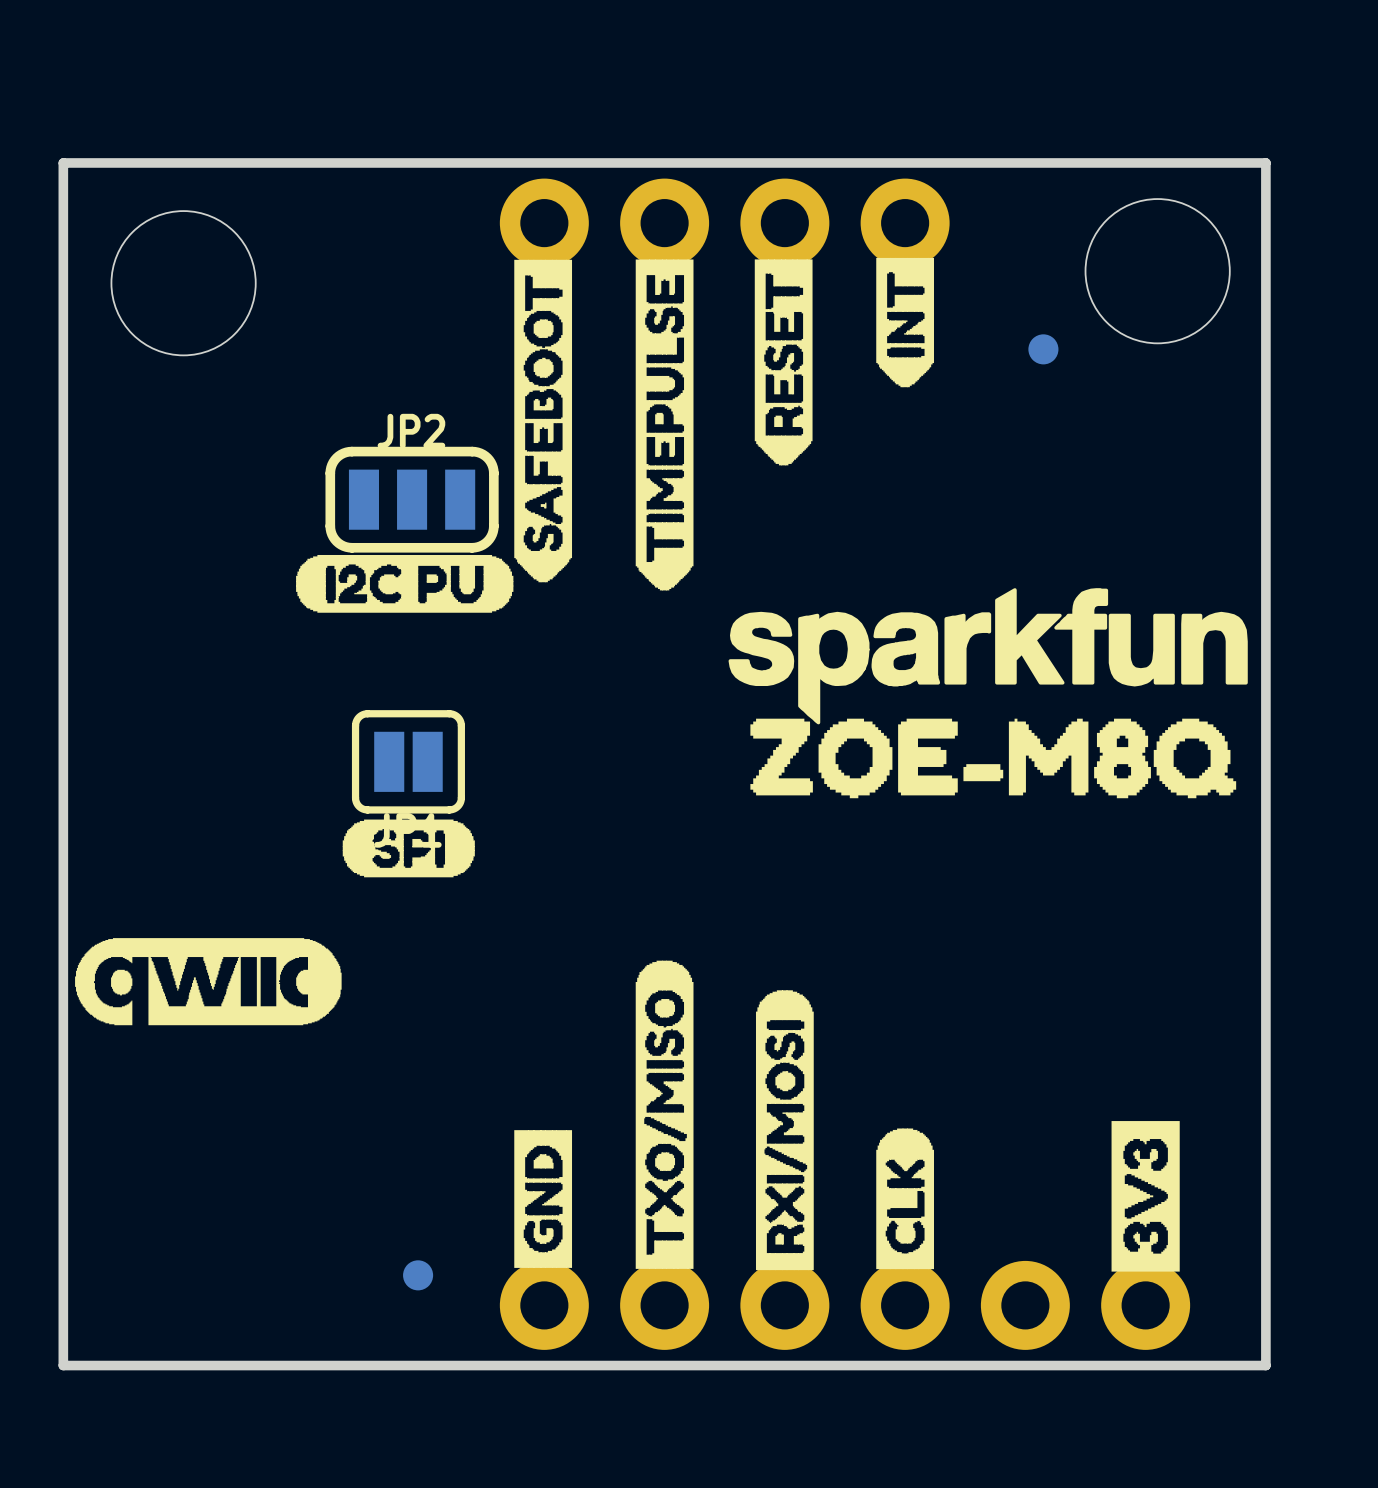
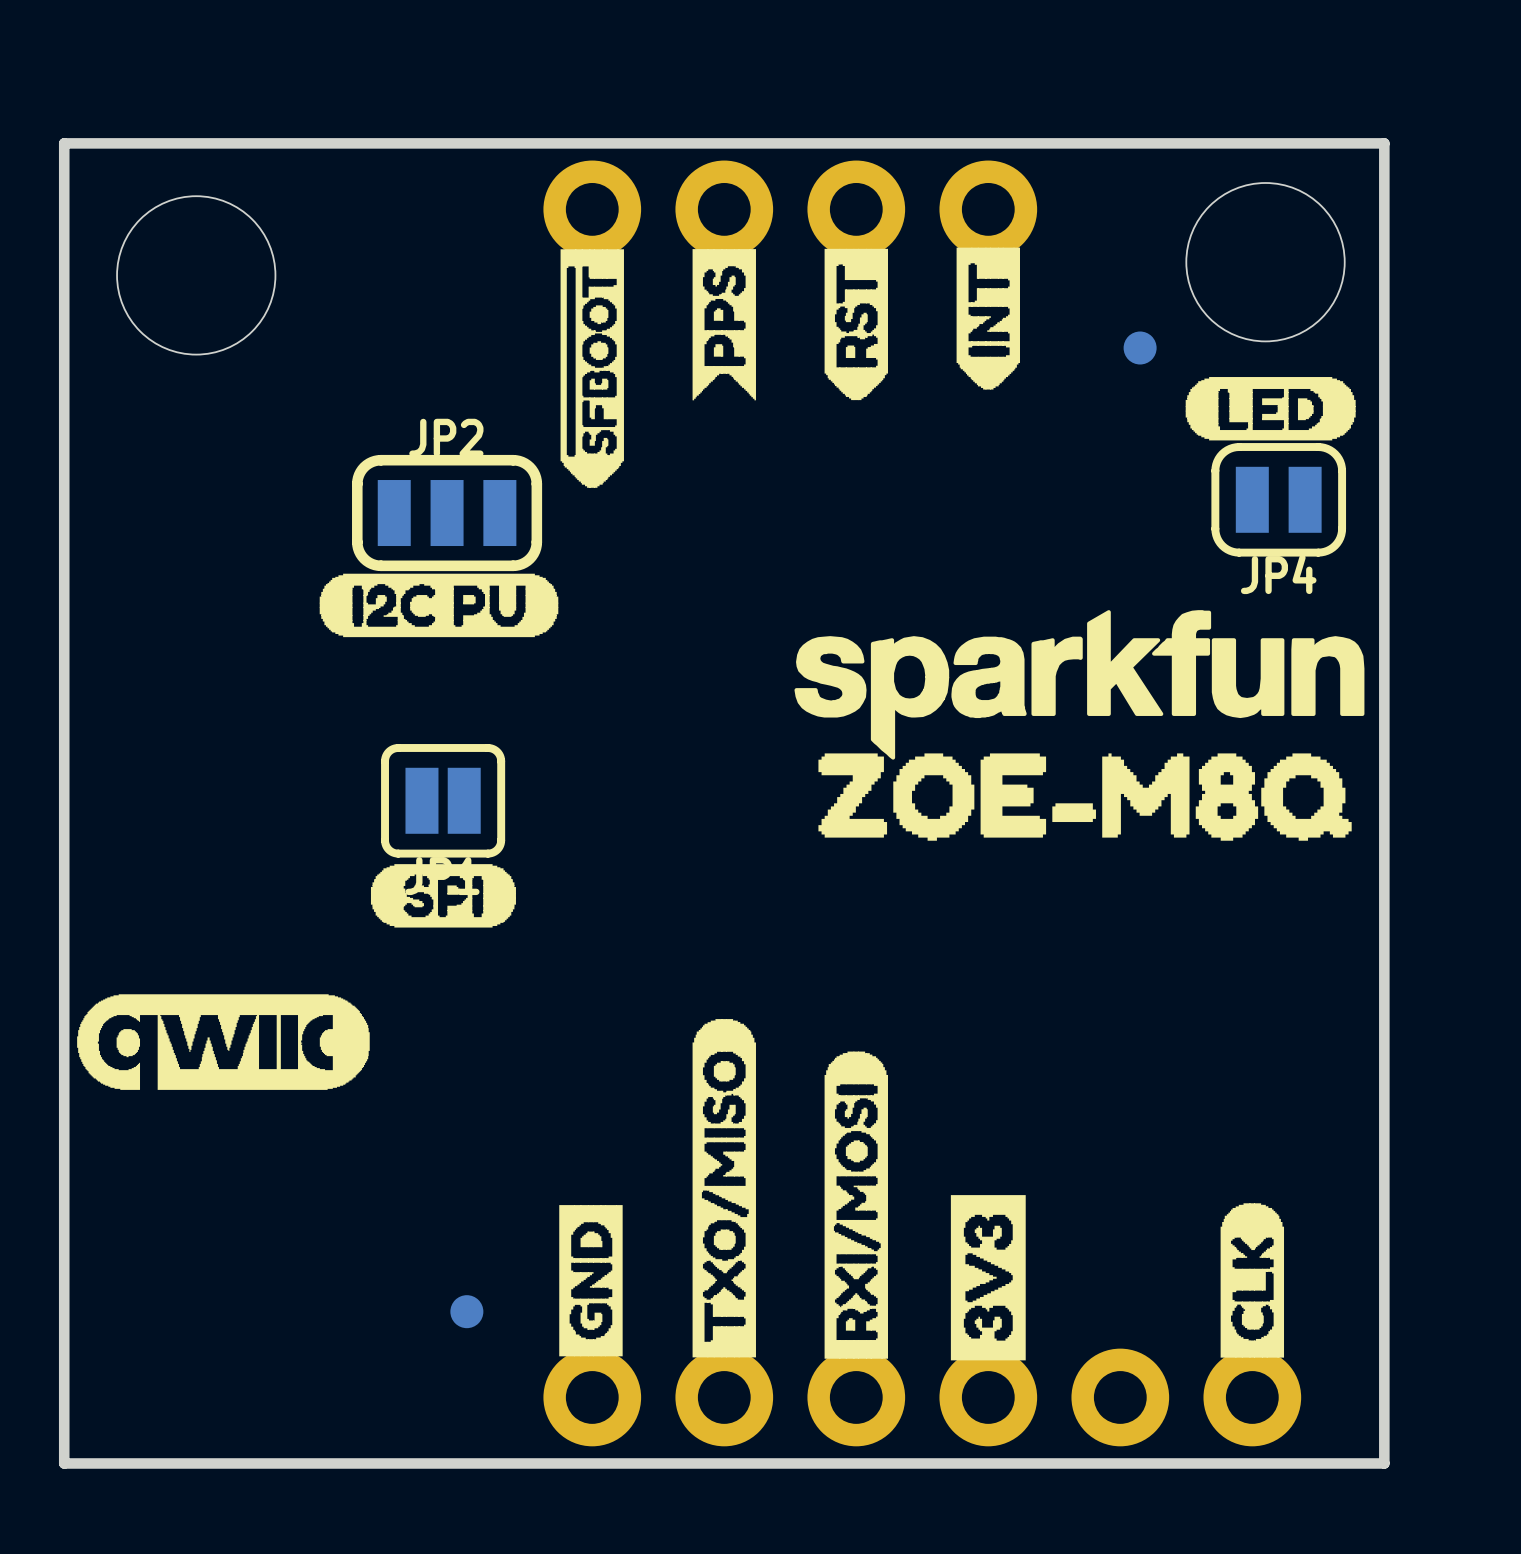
drawing: [514, 259, 573, 583] -> none
drawing: none -> [560, 249, 624, 488]
drawing: [635, 259, 694, 591] -> none
drawing: none -> [692, 249, 756, 401]
drawing shape: [754, 259, 813, 466] -> [824, 248, 888, 401]
drawing: none -> [1185, 377, 1356, 441]
JP4: none -> (1278, 499)
drawing position: (1145, 1196) -> (988, 1277)
drawing position: (905, 1198) -> (1252, 1280)
part position: (418, 1275) -> (466, 1311)

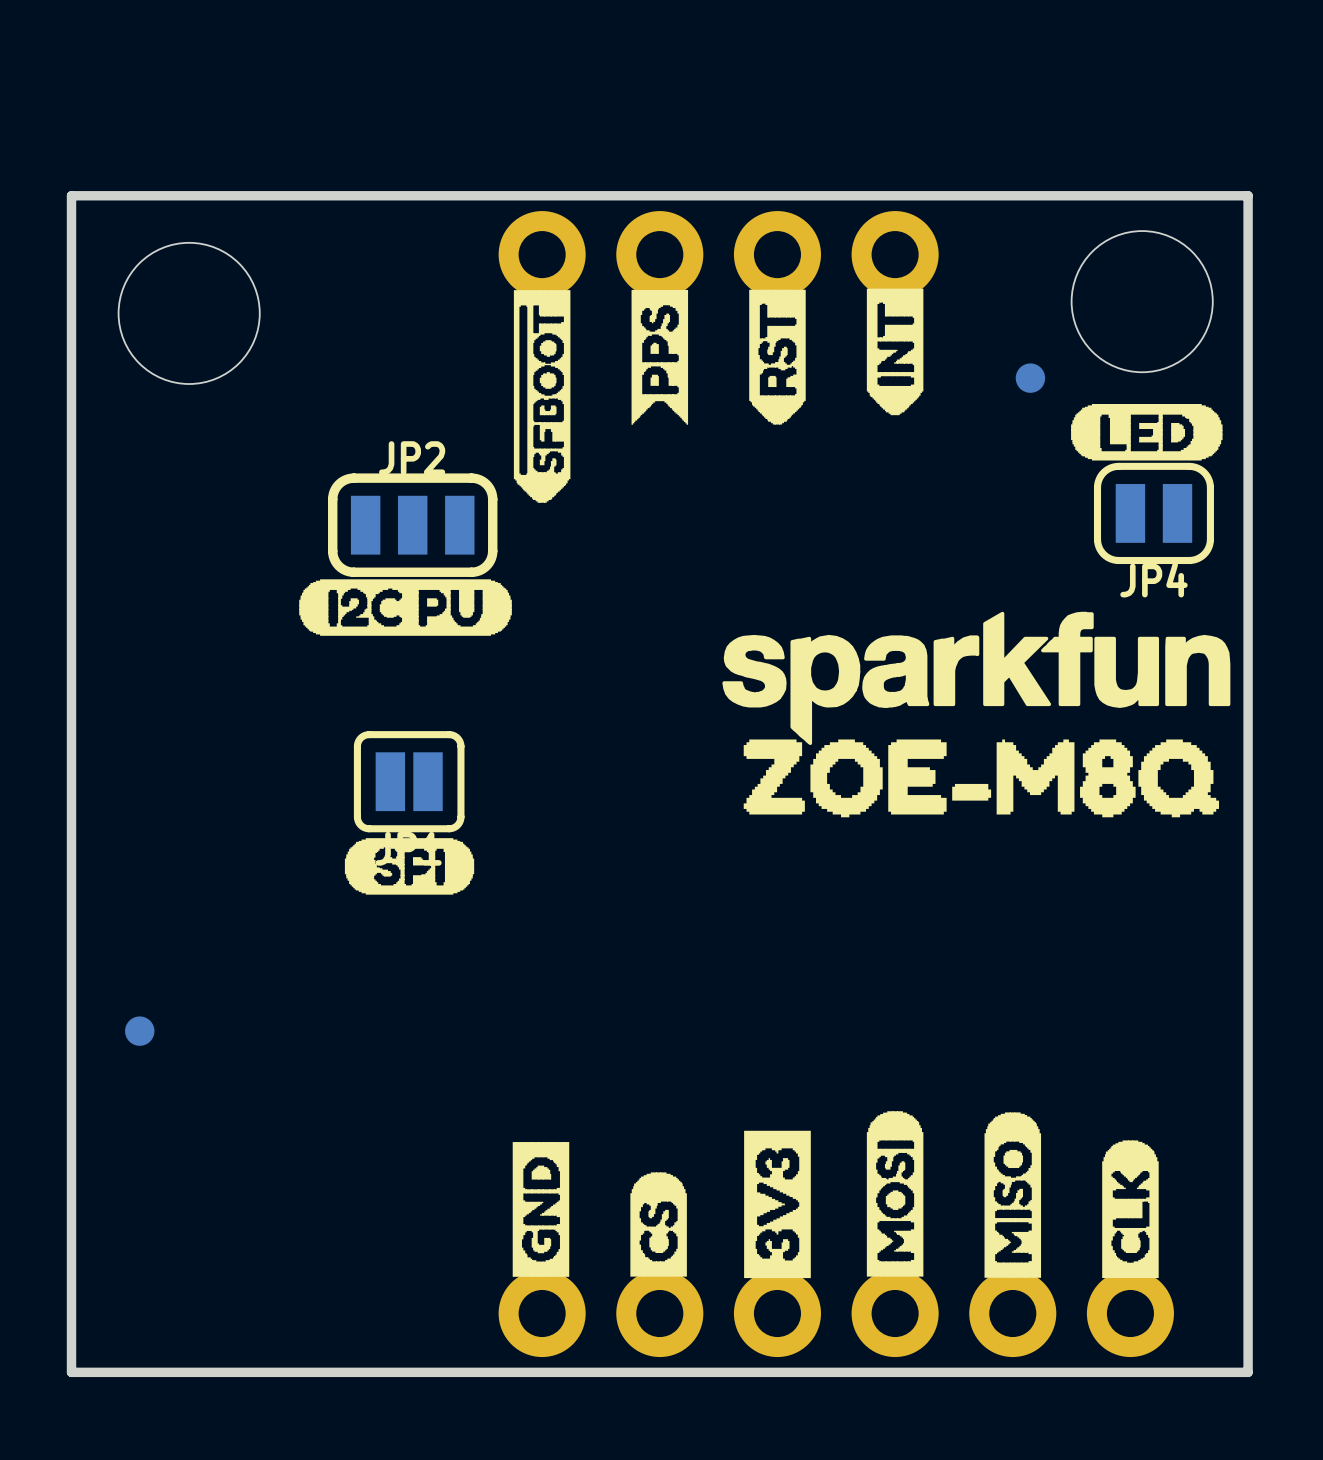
drawing: [77, 994, 370, 1090] -> none
drawing: [692, 1019, 756, 1358] -> none
drawing: [824, 1051, 888, 1359] -> none
drawing: none -> [866, 1111, 924, 1277]
drawing: none -> [984, 1112, 1042, 1278]
drawing: none -> [630, 1172, 687, 1277]
drawing position: (988, 1277) -> (777, 1204)
part position: (466, 1311) -> (139, 1031)

